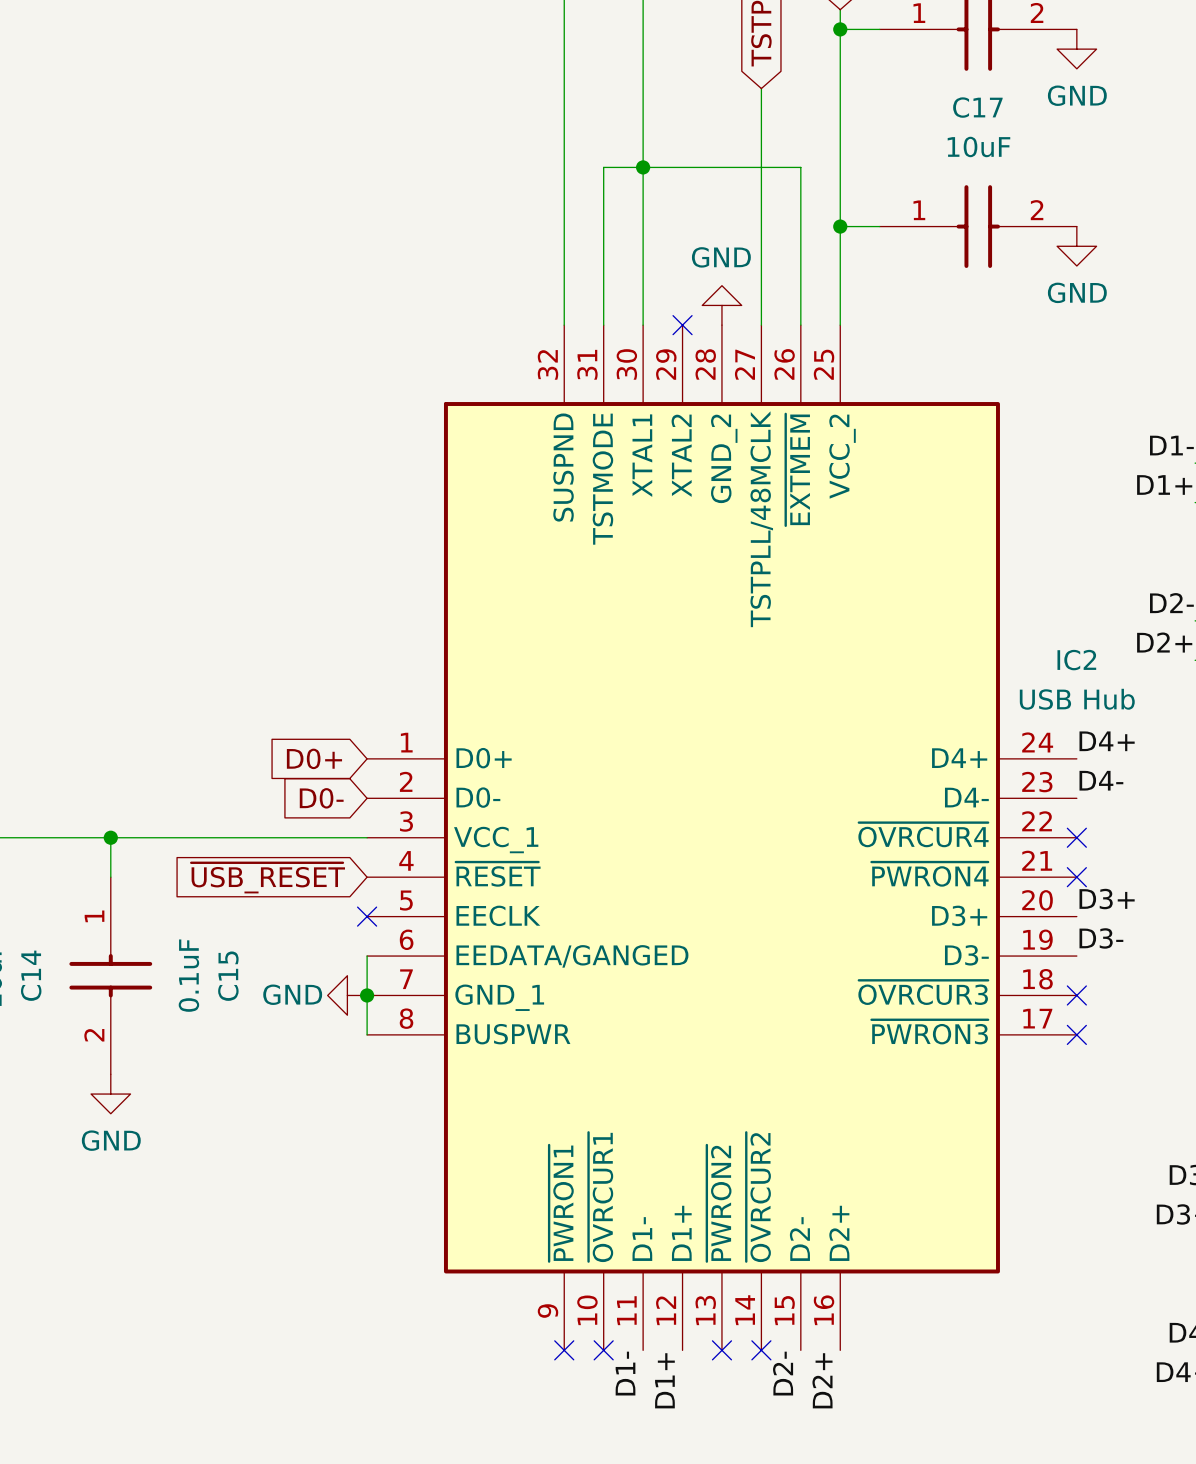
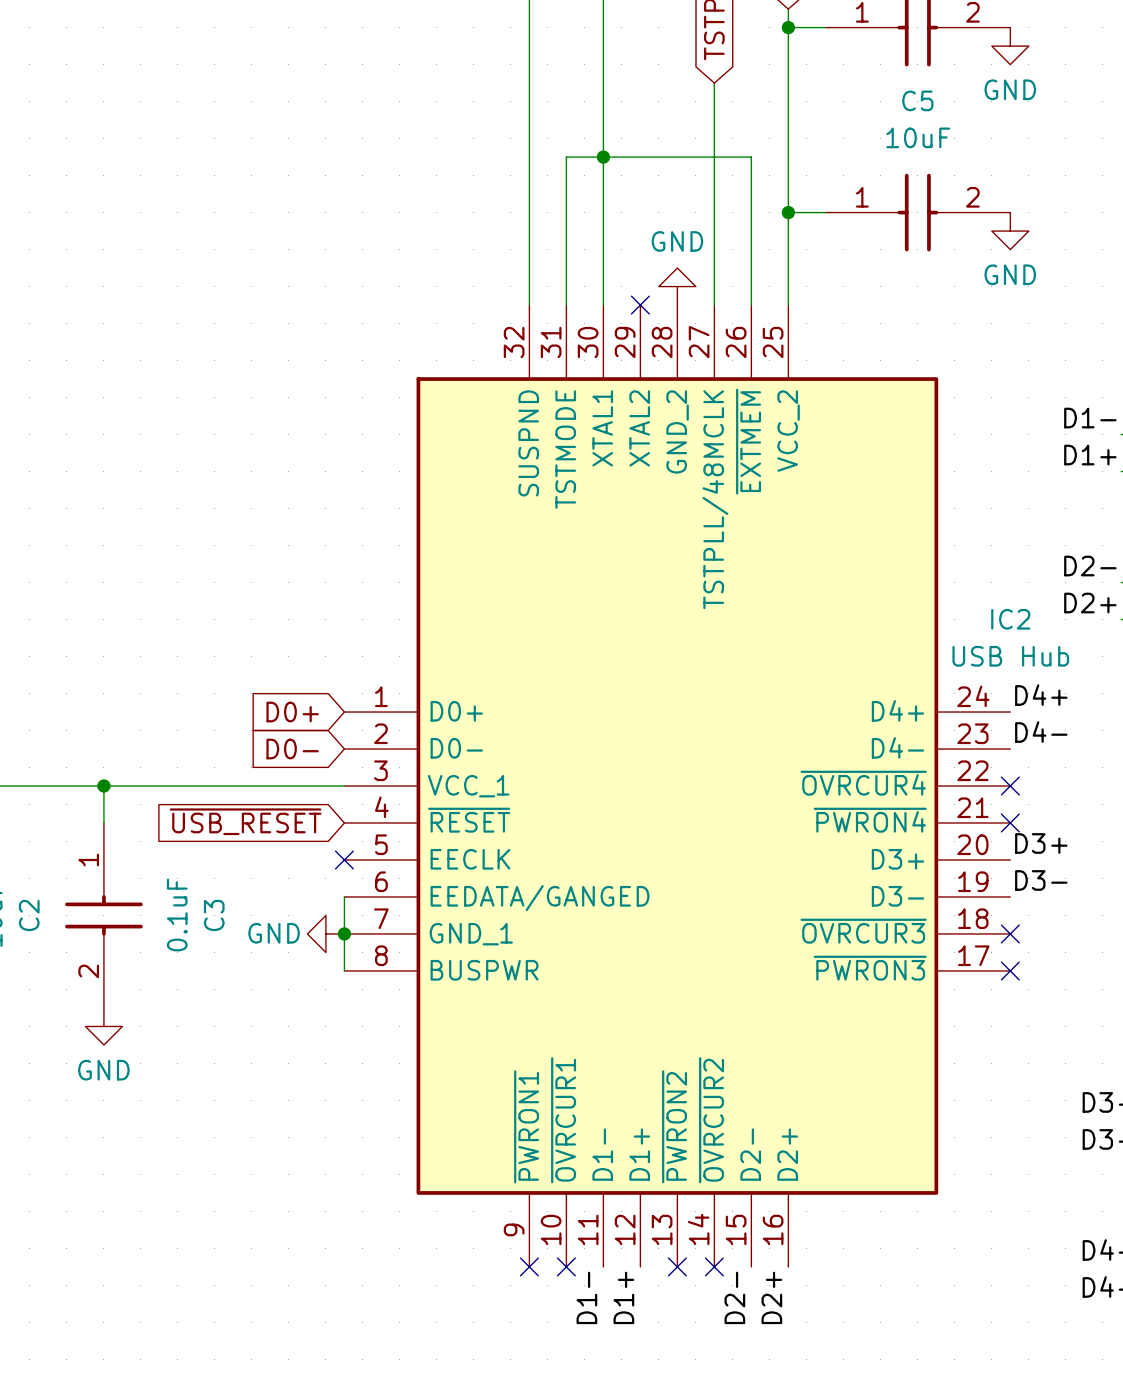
C17 name: C17 (977, 107) -> C5 (917, 100)
C14 name: C14 (31, 975) -> C2 (29, 915)
C15 name: C15 (228, 976) -> C3 (214, 915)

